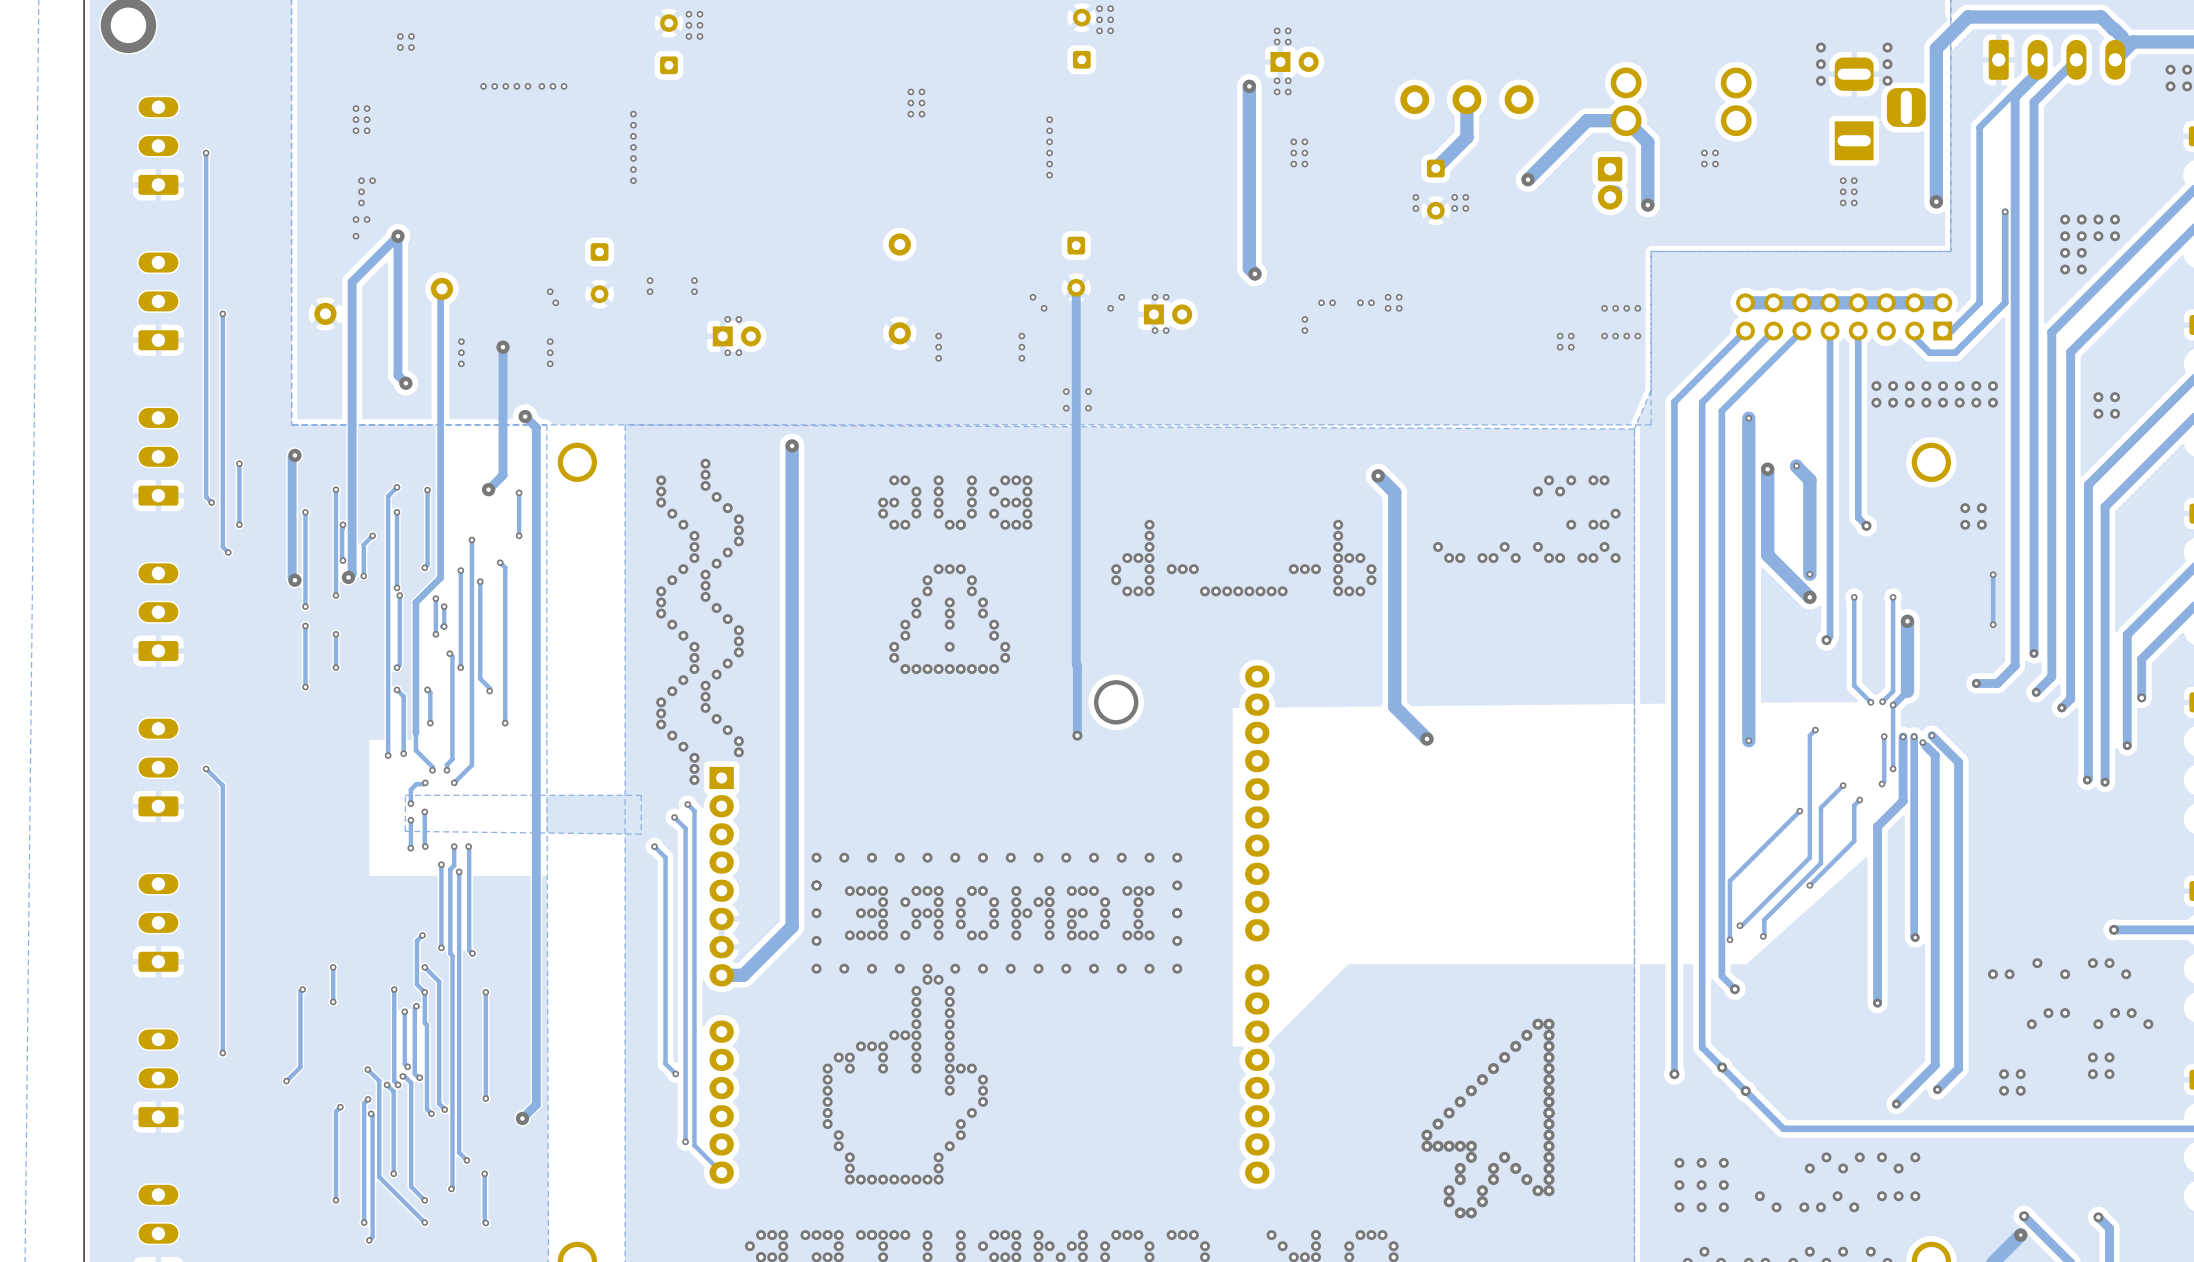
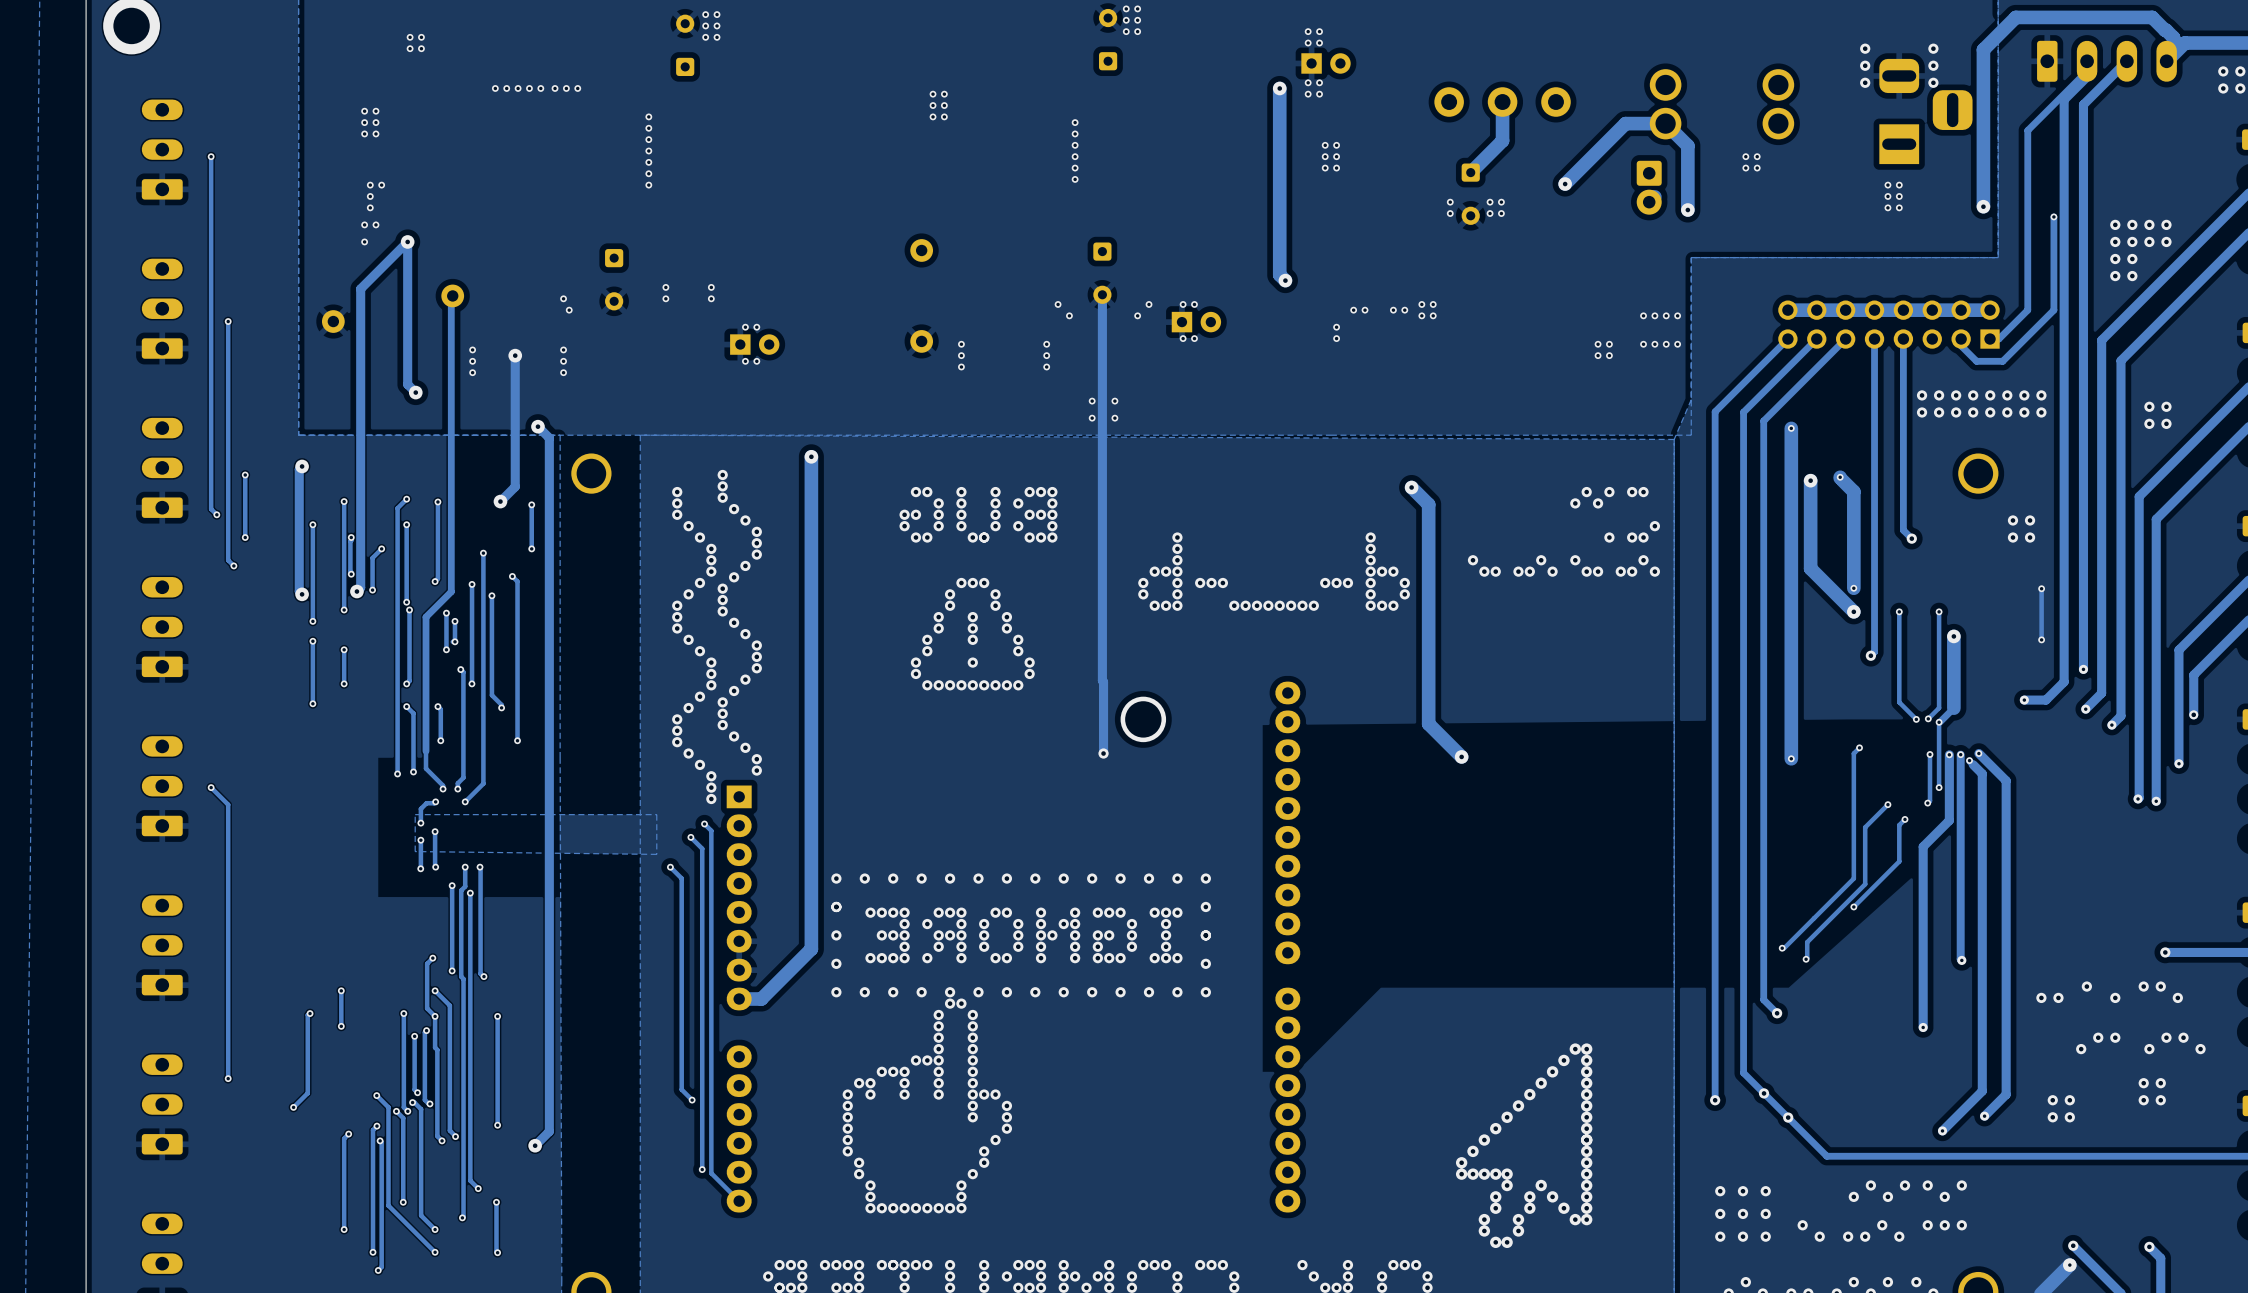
track: (1799, 811) (1729, 881) (1729, 939) -> none
via: (1799, 811) -> none
via: (1729, 939) -> none

